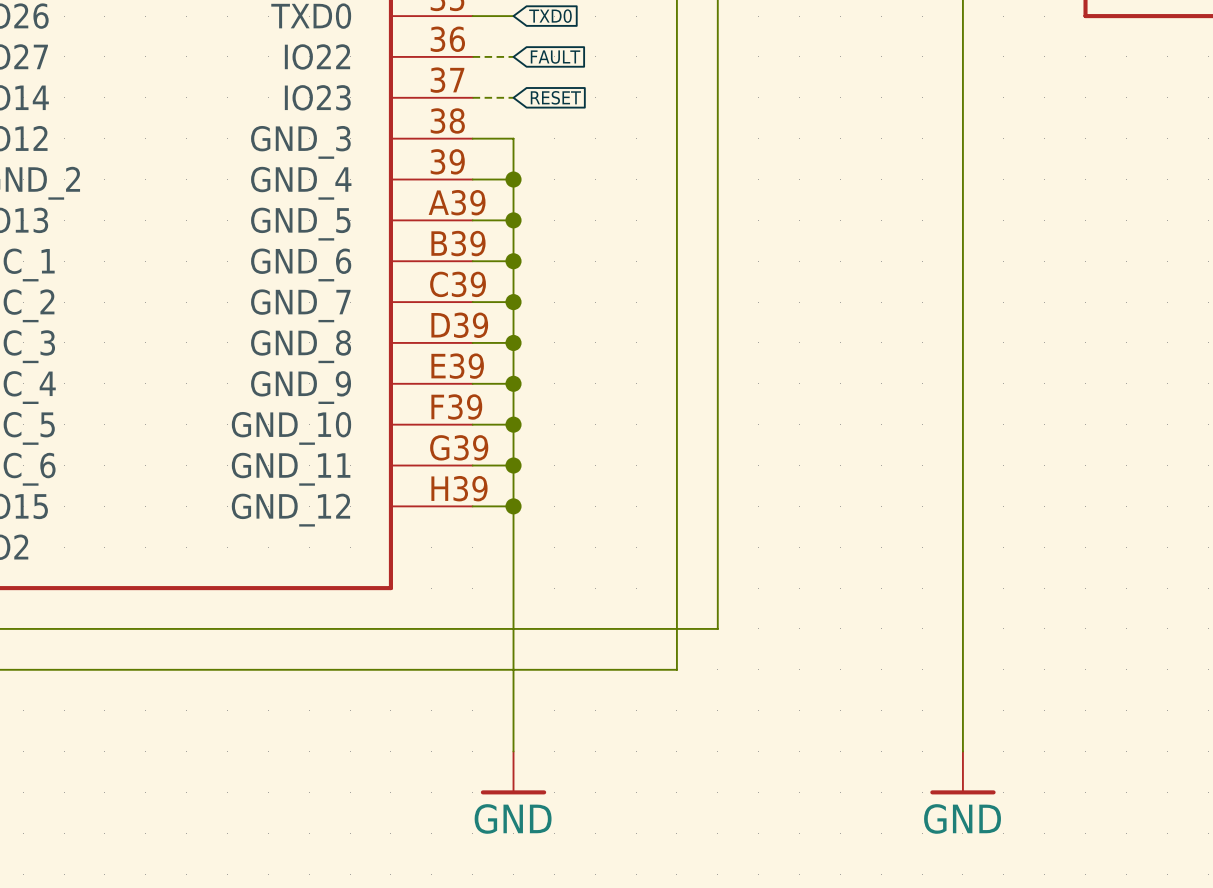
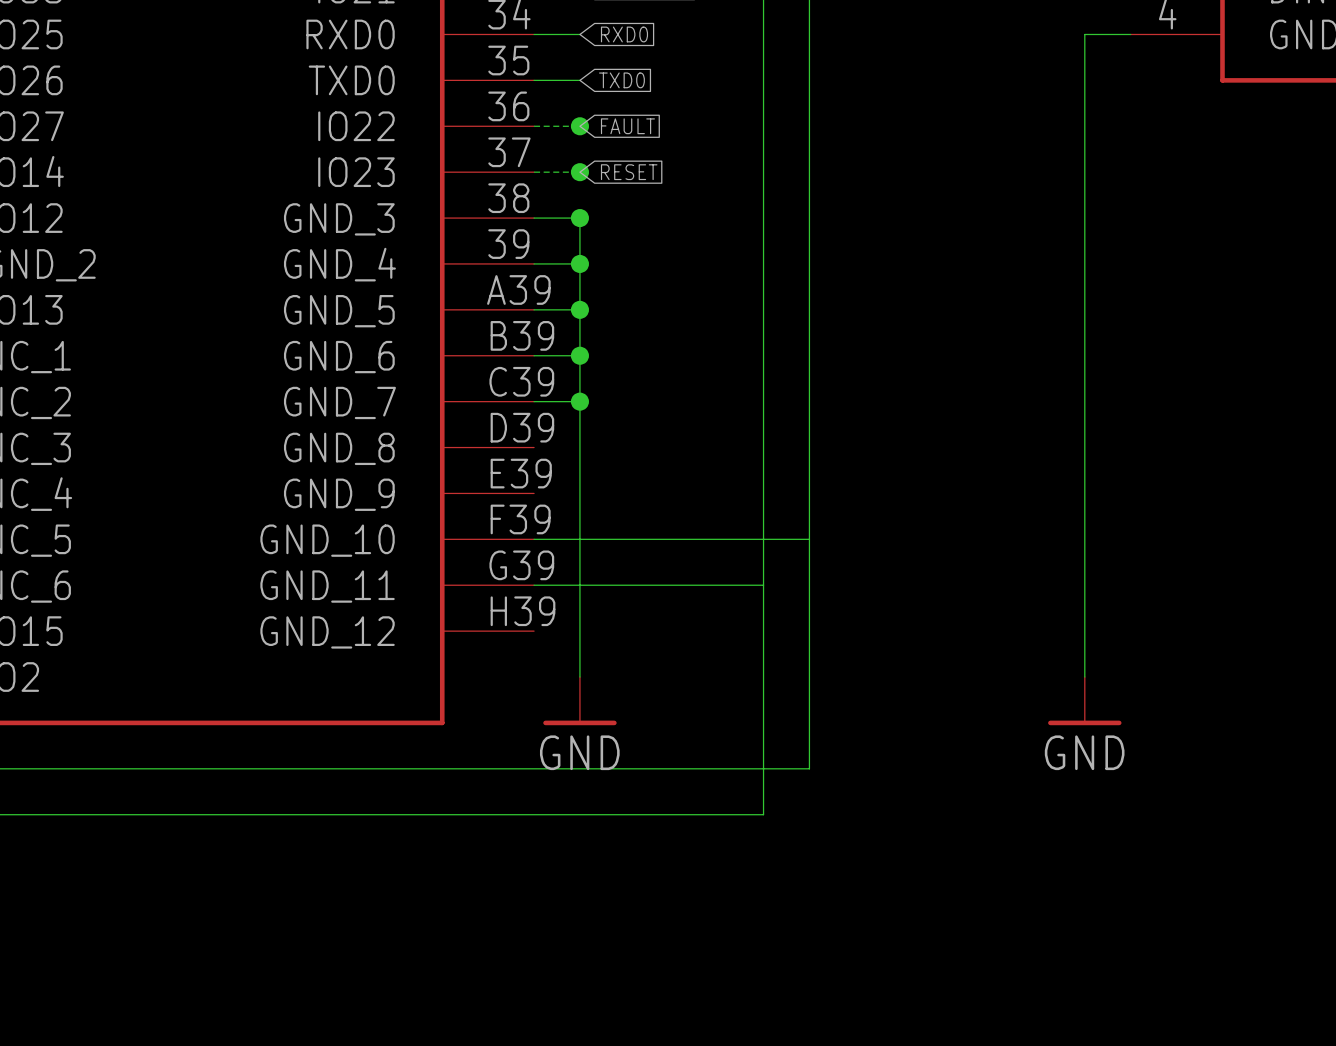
junction: none -> (579, 126)
junction: none -> (579, 172)
junction: none -> (579, 218)
wire: (472, 342) (513, 342) -> none
junction: (513, 342) -> none
wire: (472, 383) (513, 383) -> none
junction: (513, 383) -> none
wire: none -> (579, 539) (809, 539)
junction: (513, 424) -> none
wire: none -> (579, 585) (763, 585)
junction: (513, 465) -> none
wire: (472, 506) (513, 506) -> none
junction: (513, 506) -> none
wire: (513, 547) (513, 751) -> none
wire: (962, 547) (962, 751) -> none
power symbol position: GND (513, 772) -> GND (579, 701)
power symbol position: GND (962, 772) -> GND (1084, 701)

